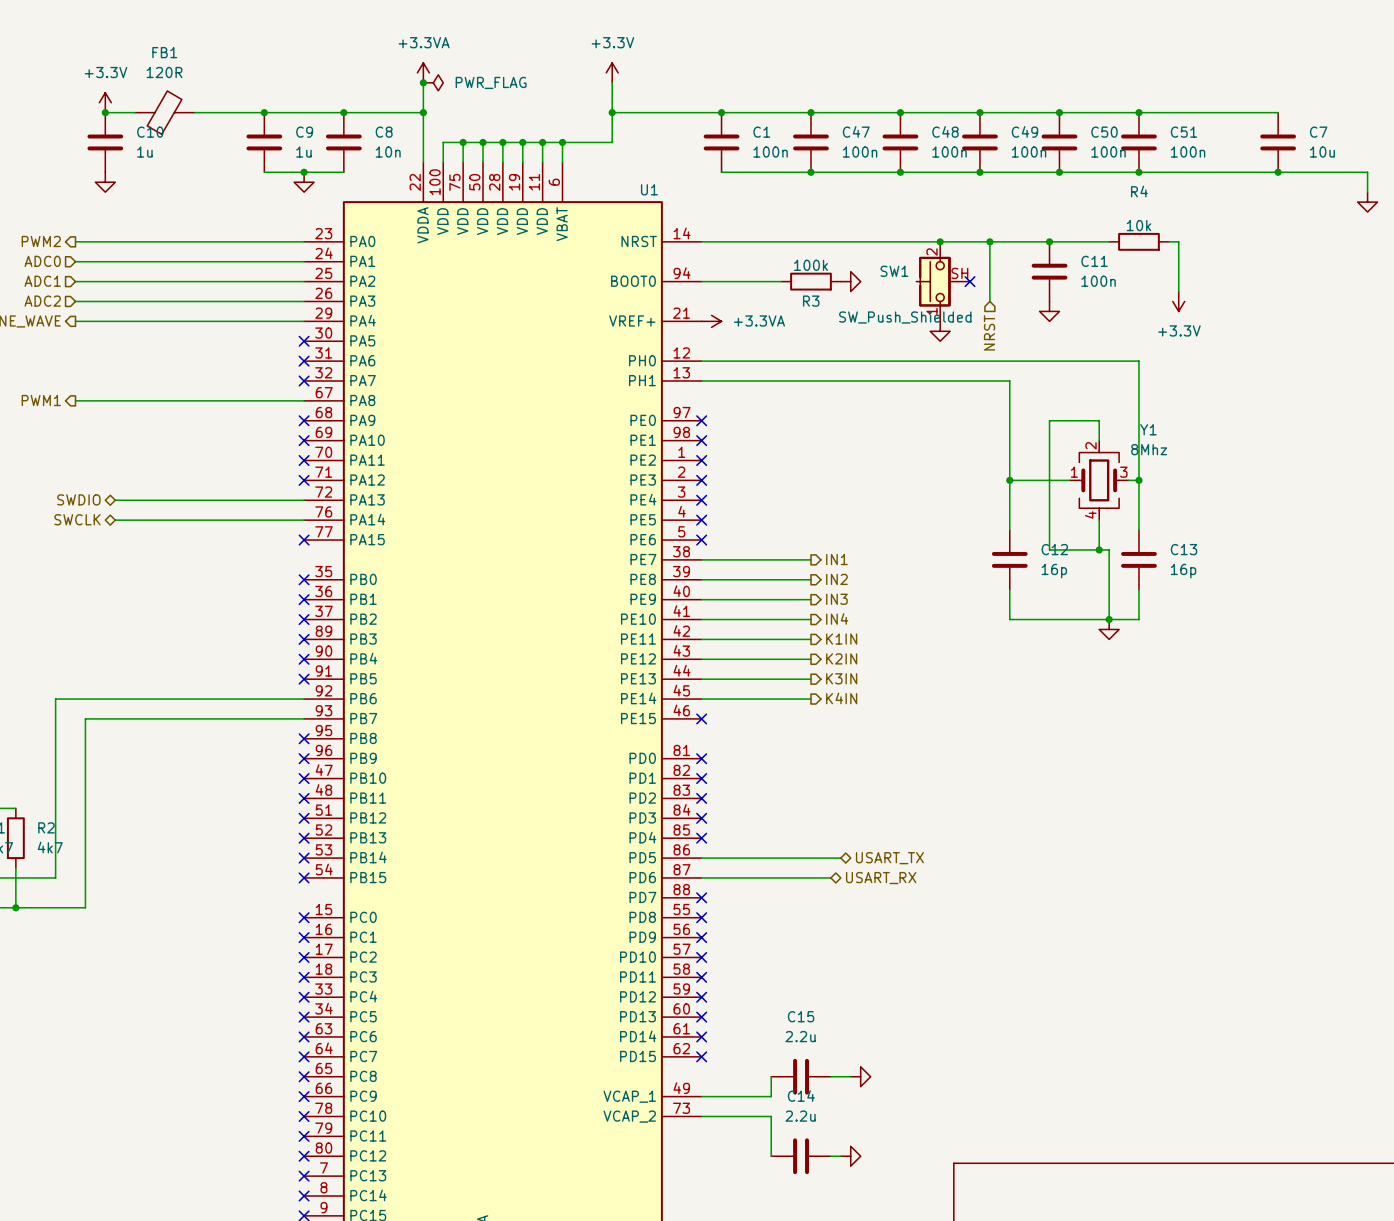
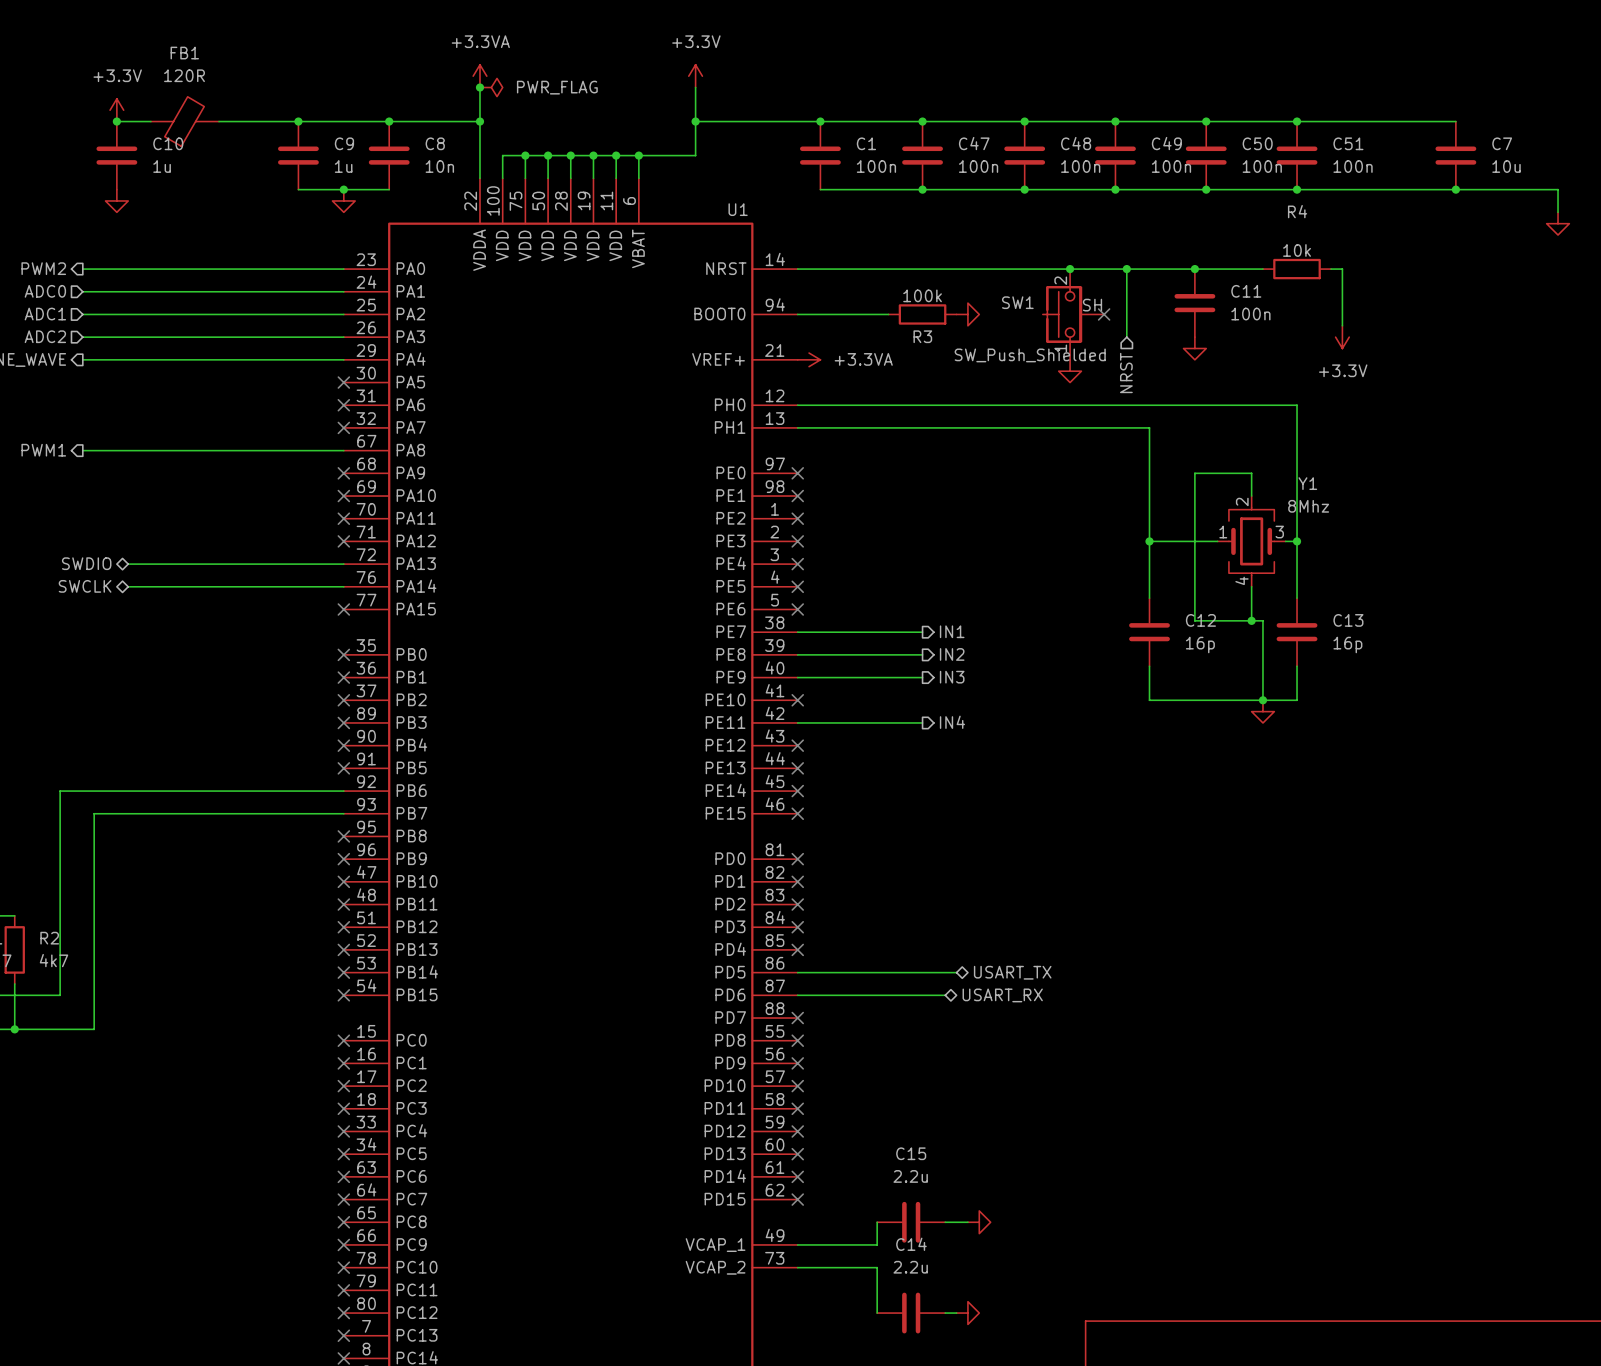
hierarchical label: IN4 (837, 618) -> none
wire: (701, 619) (810, 619) -> none
no-connect mark: none -> (797, 700)
hierarchical label: K1IN (841, 639) -> IN4 (952, 722)
hierarchical label: K2IN (841, 658) -> none
wire: (701, 659) (810, 659) -> none
no-connect mark: none -> (797, 745)
hierarchical label: K3IN (841, 678) -> none
wire: (701, 679) (810, 679) -> none
no-connect mark: none -> (797, 768)
hierarchical label: K4IN (841, 698) -> none
wire: (701, 699) (810, 699) -> none
no-connect mark: none -> (797, 791)

